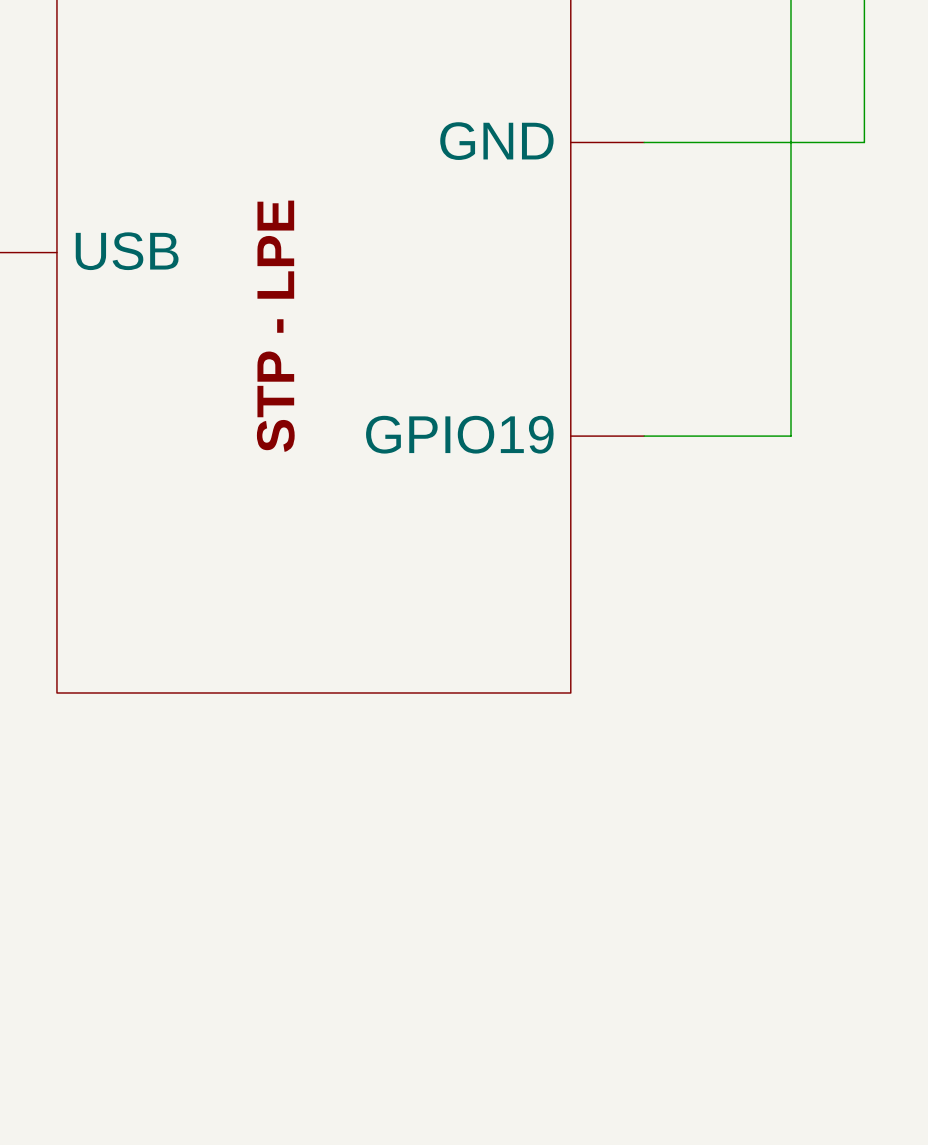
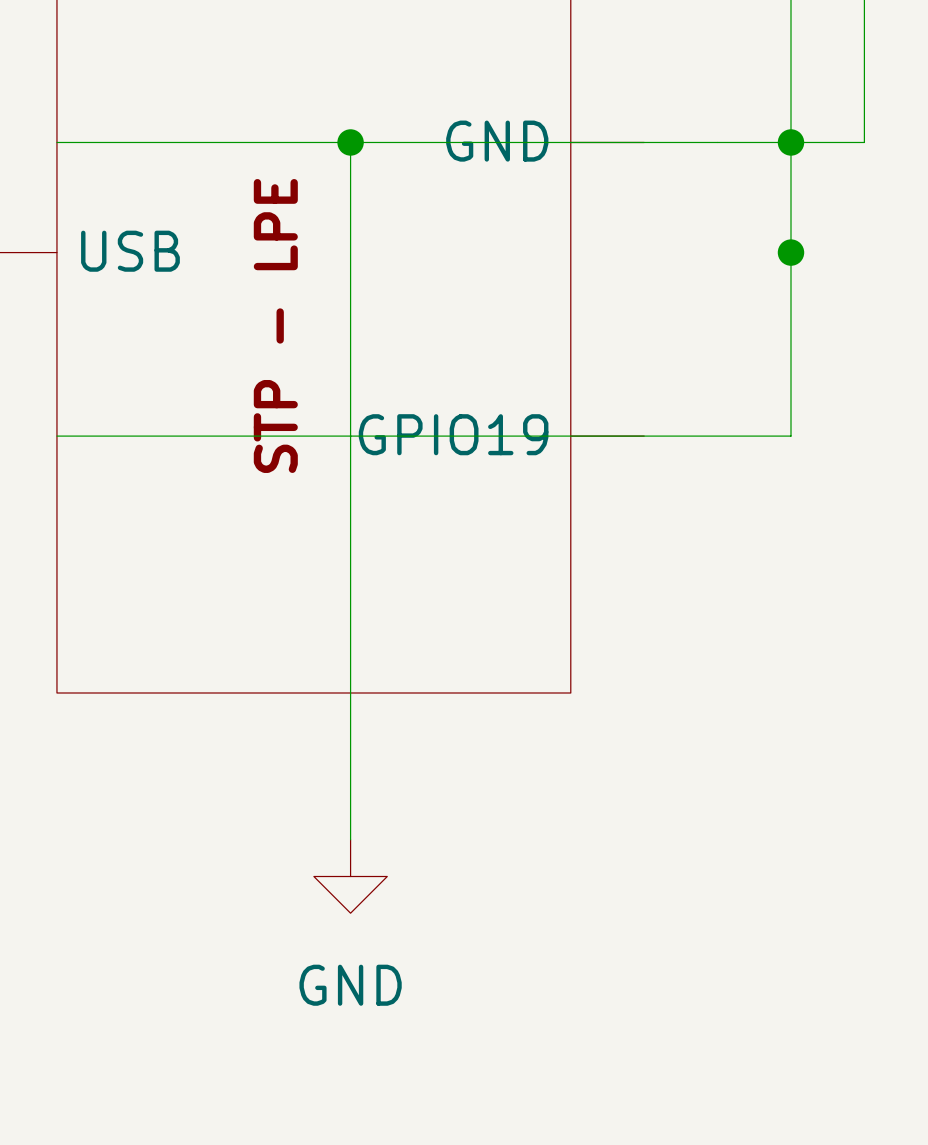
wire: none -> (56, 142) (644, 142)
wire: none -> (350, 142) (350, 839)
junction: none -> (350, 142)
junction: none -> (790, 142)
junction: none -> (790, 252)
wire: none -> (56, 436) (644, 436)
power symbol: none -> GND (350, 876)

